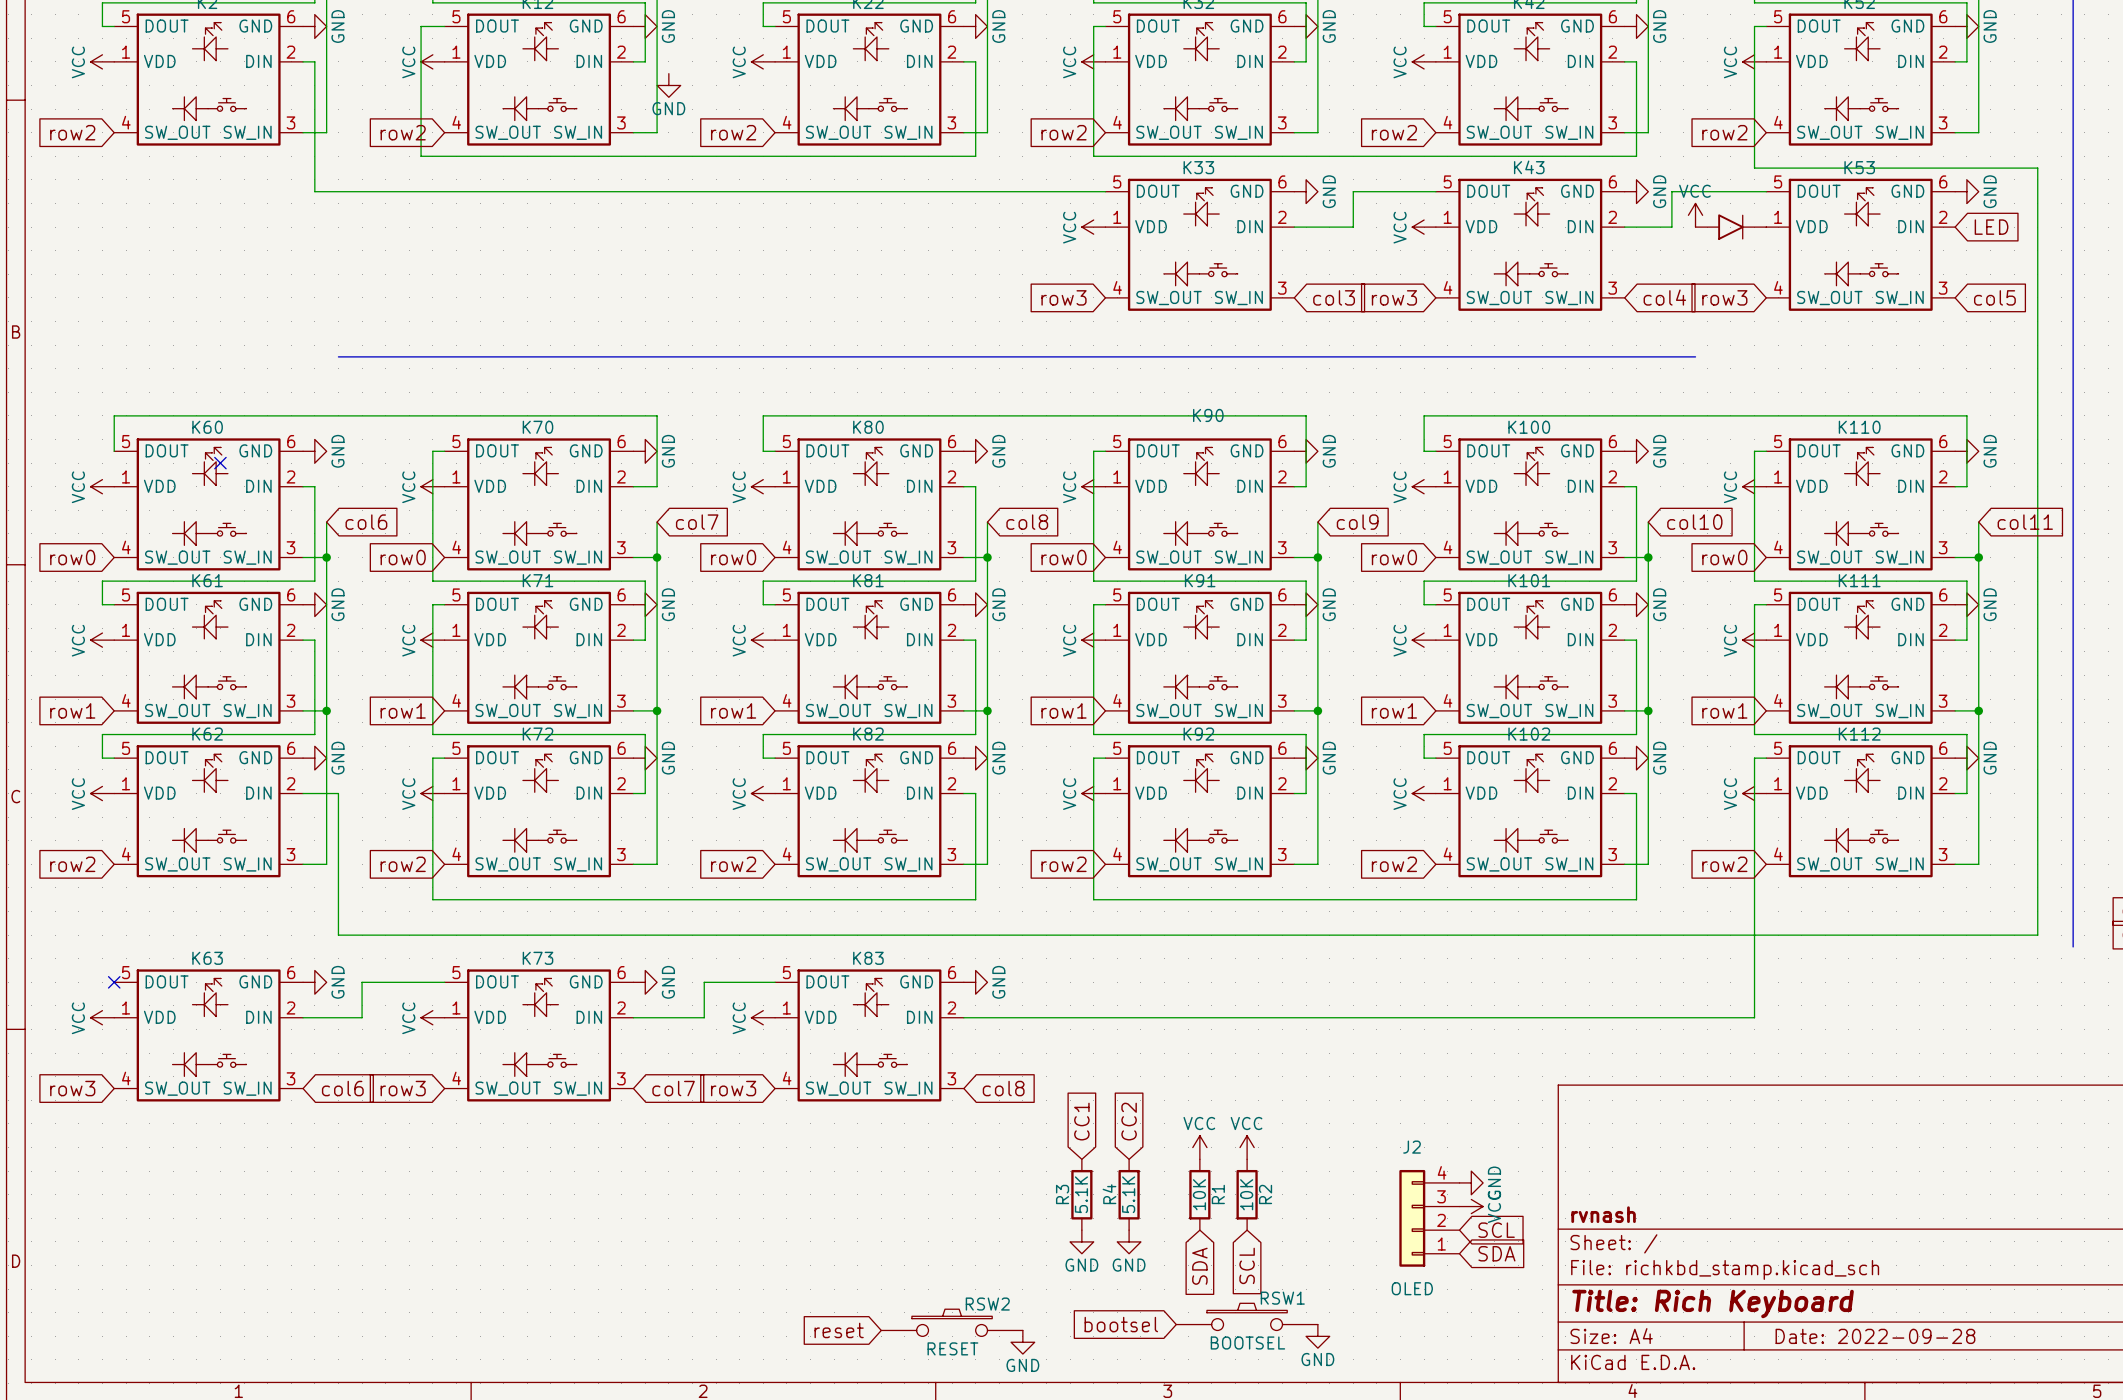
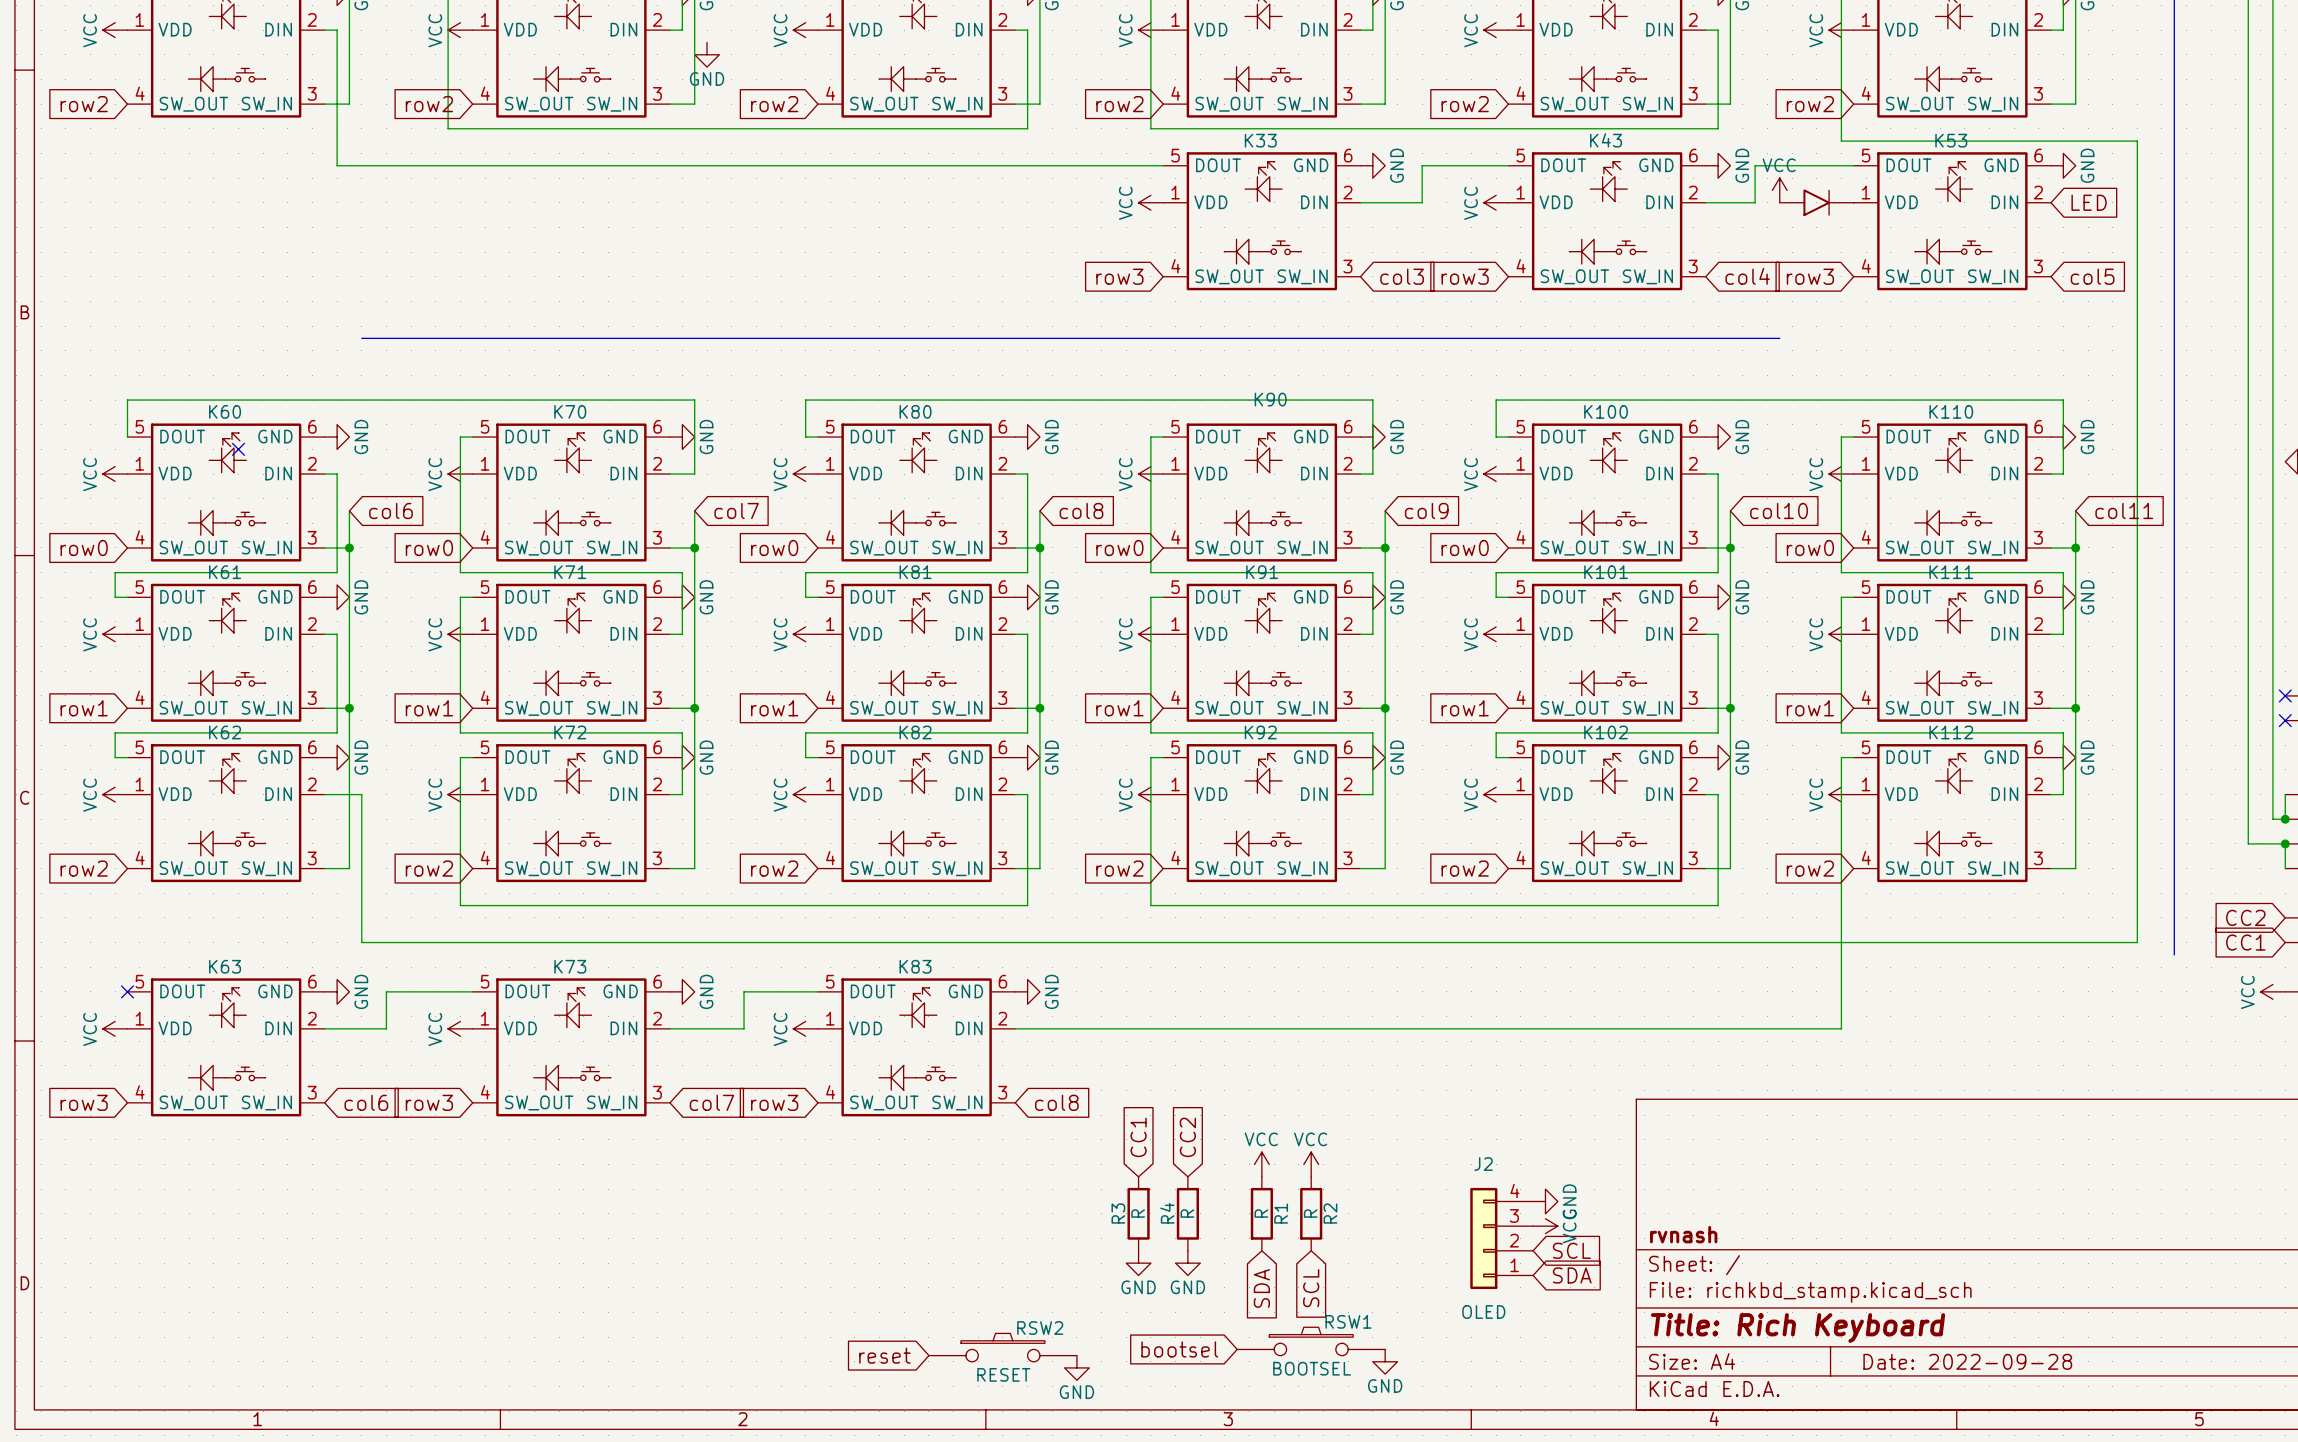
R3 value: 5.1K (1081, 1194) -> R (1138, 1213)
R4 value: 5.1K (1128, 1194) -> R (1187, 1213)
R1 value: 10K (1199, 1194) -> R (1261, 1213)
R2 value: 10K (1246, 1194) -> R (1310, 1213)

